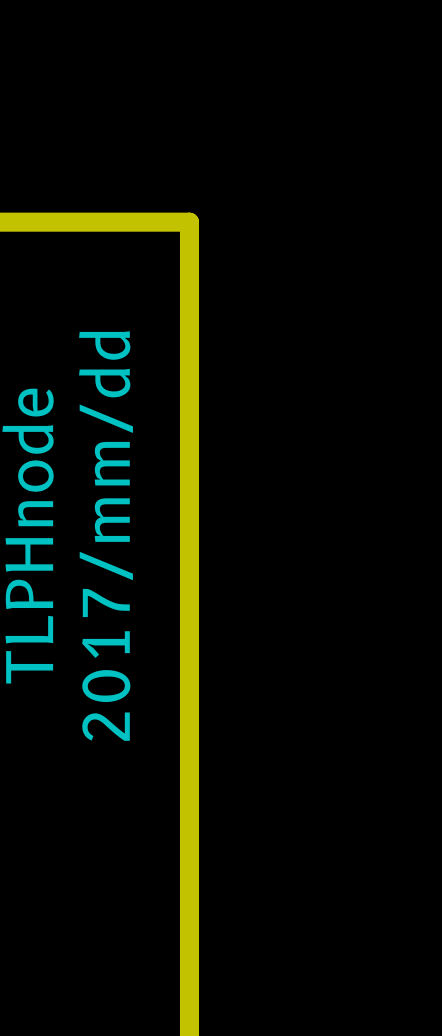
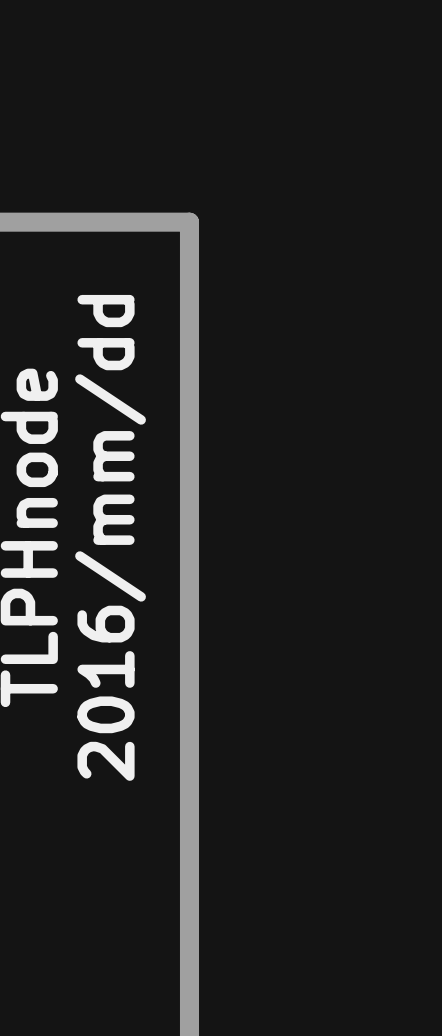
text: 2017/mm/dd (106, 536) -> 2016/mm/dd (110, 537)

